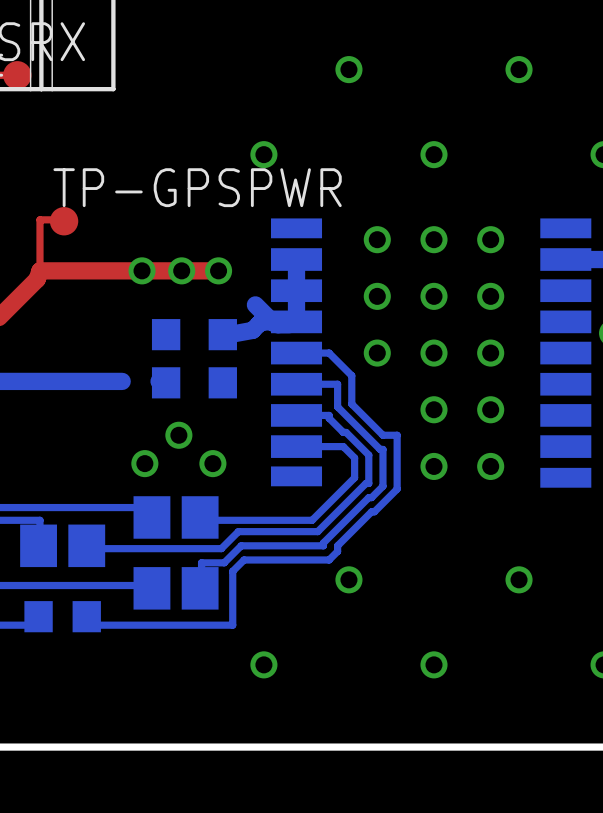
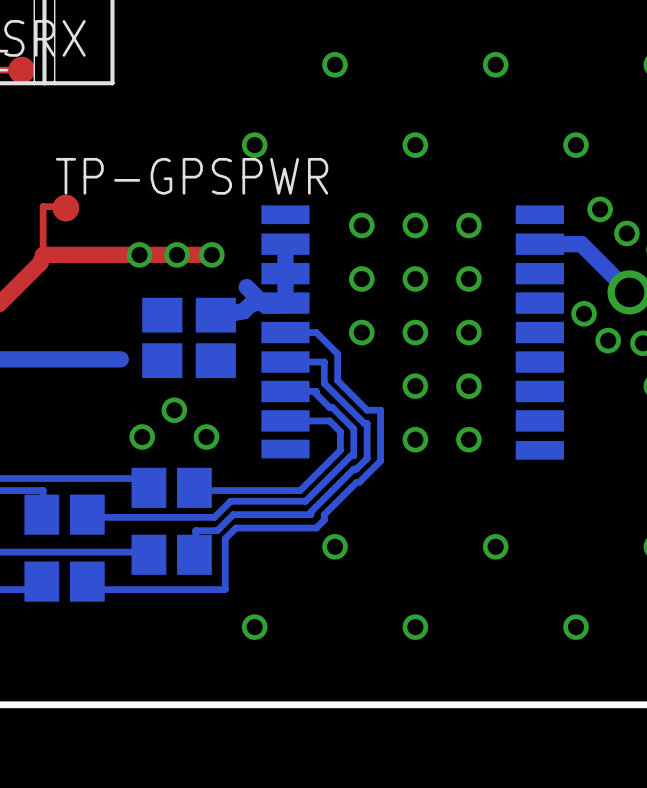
part footprint: [151, 319, 181, 399] -> [142, 297, 183, 379]
part footprint: [208, 319, 237, 399] -> [195, 297, 236, 379]
part footprint: [24, 601, 101, 633] -> [24, 561, 105, 602]

